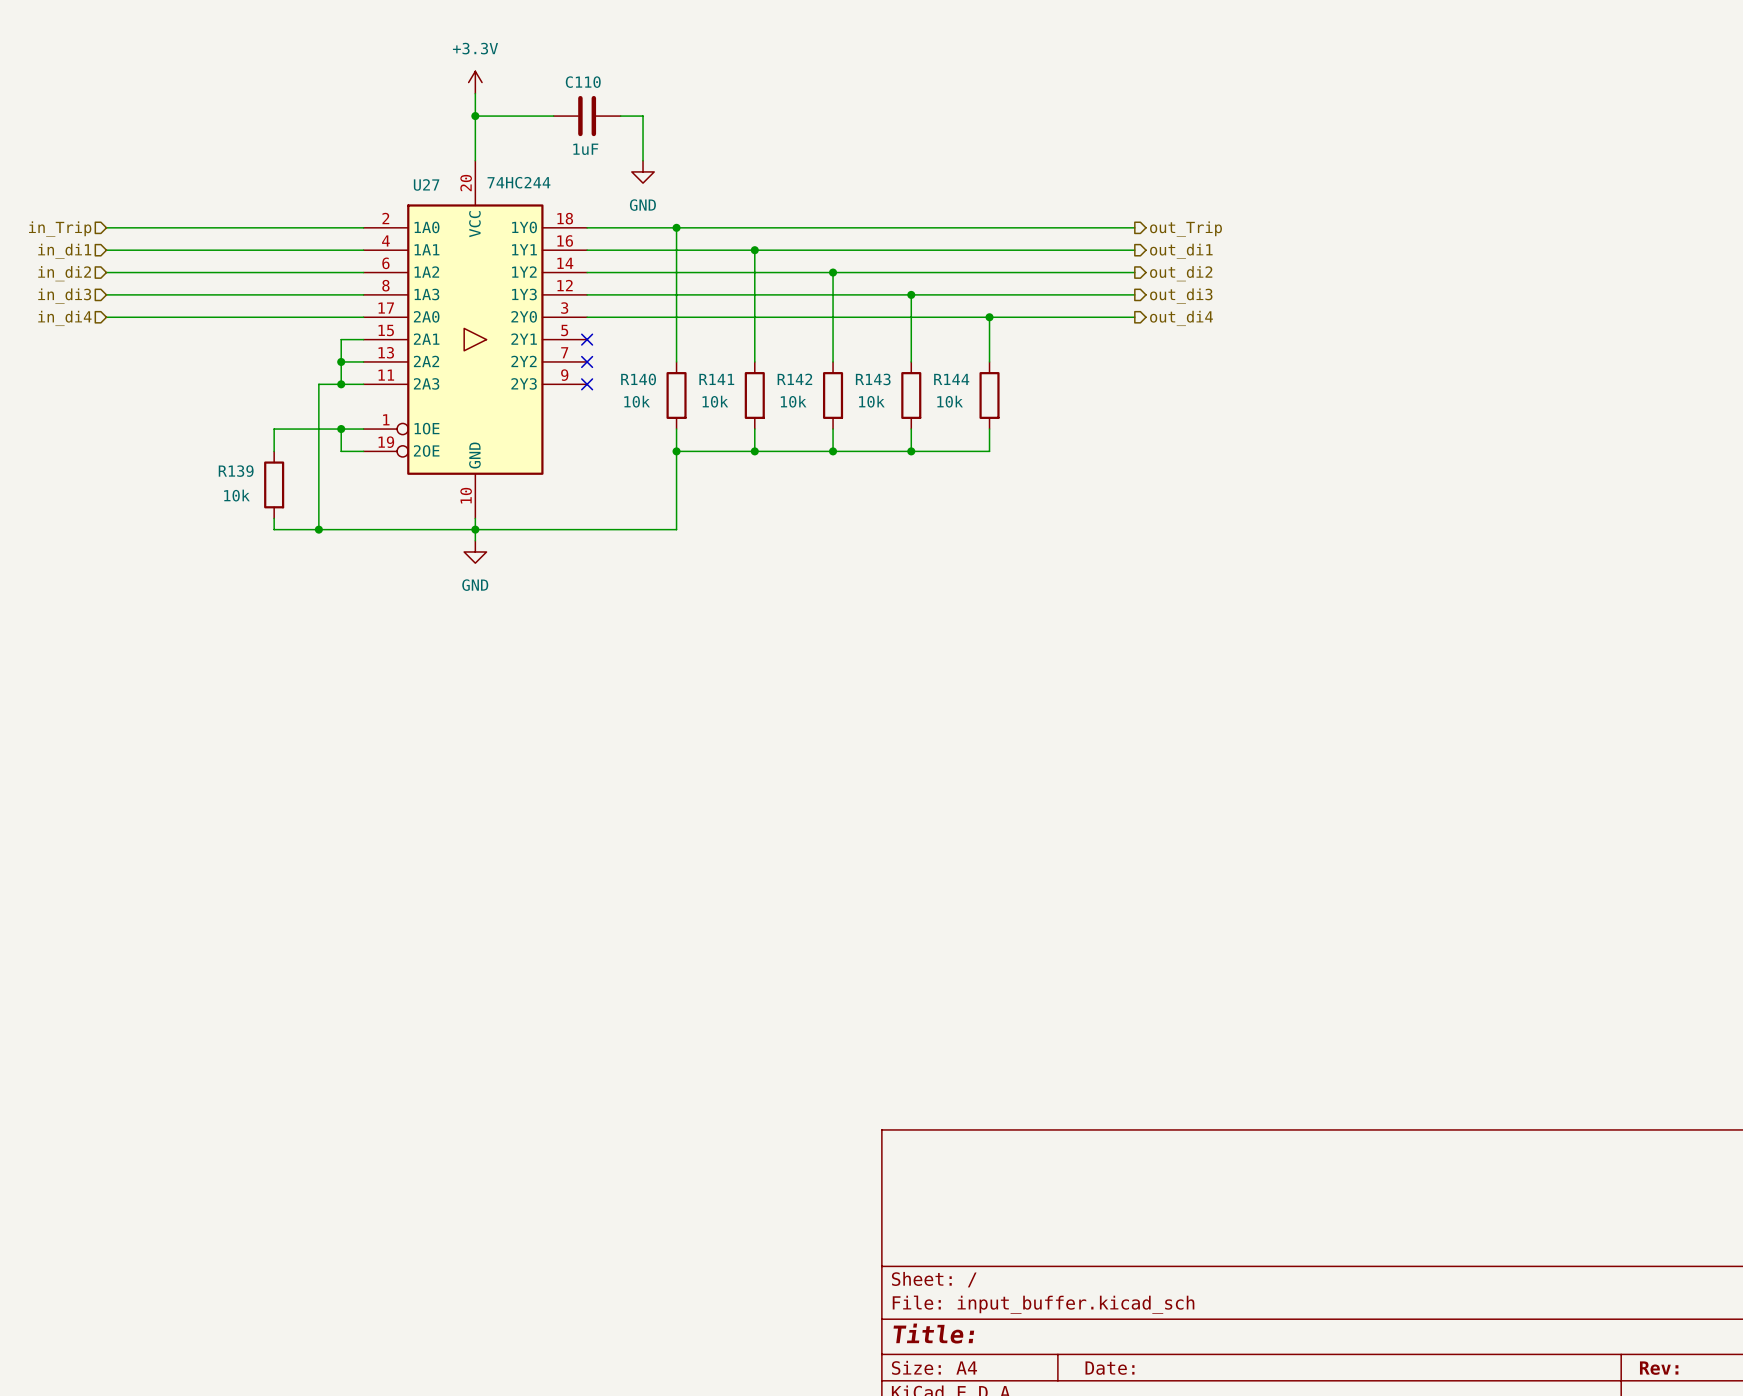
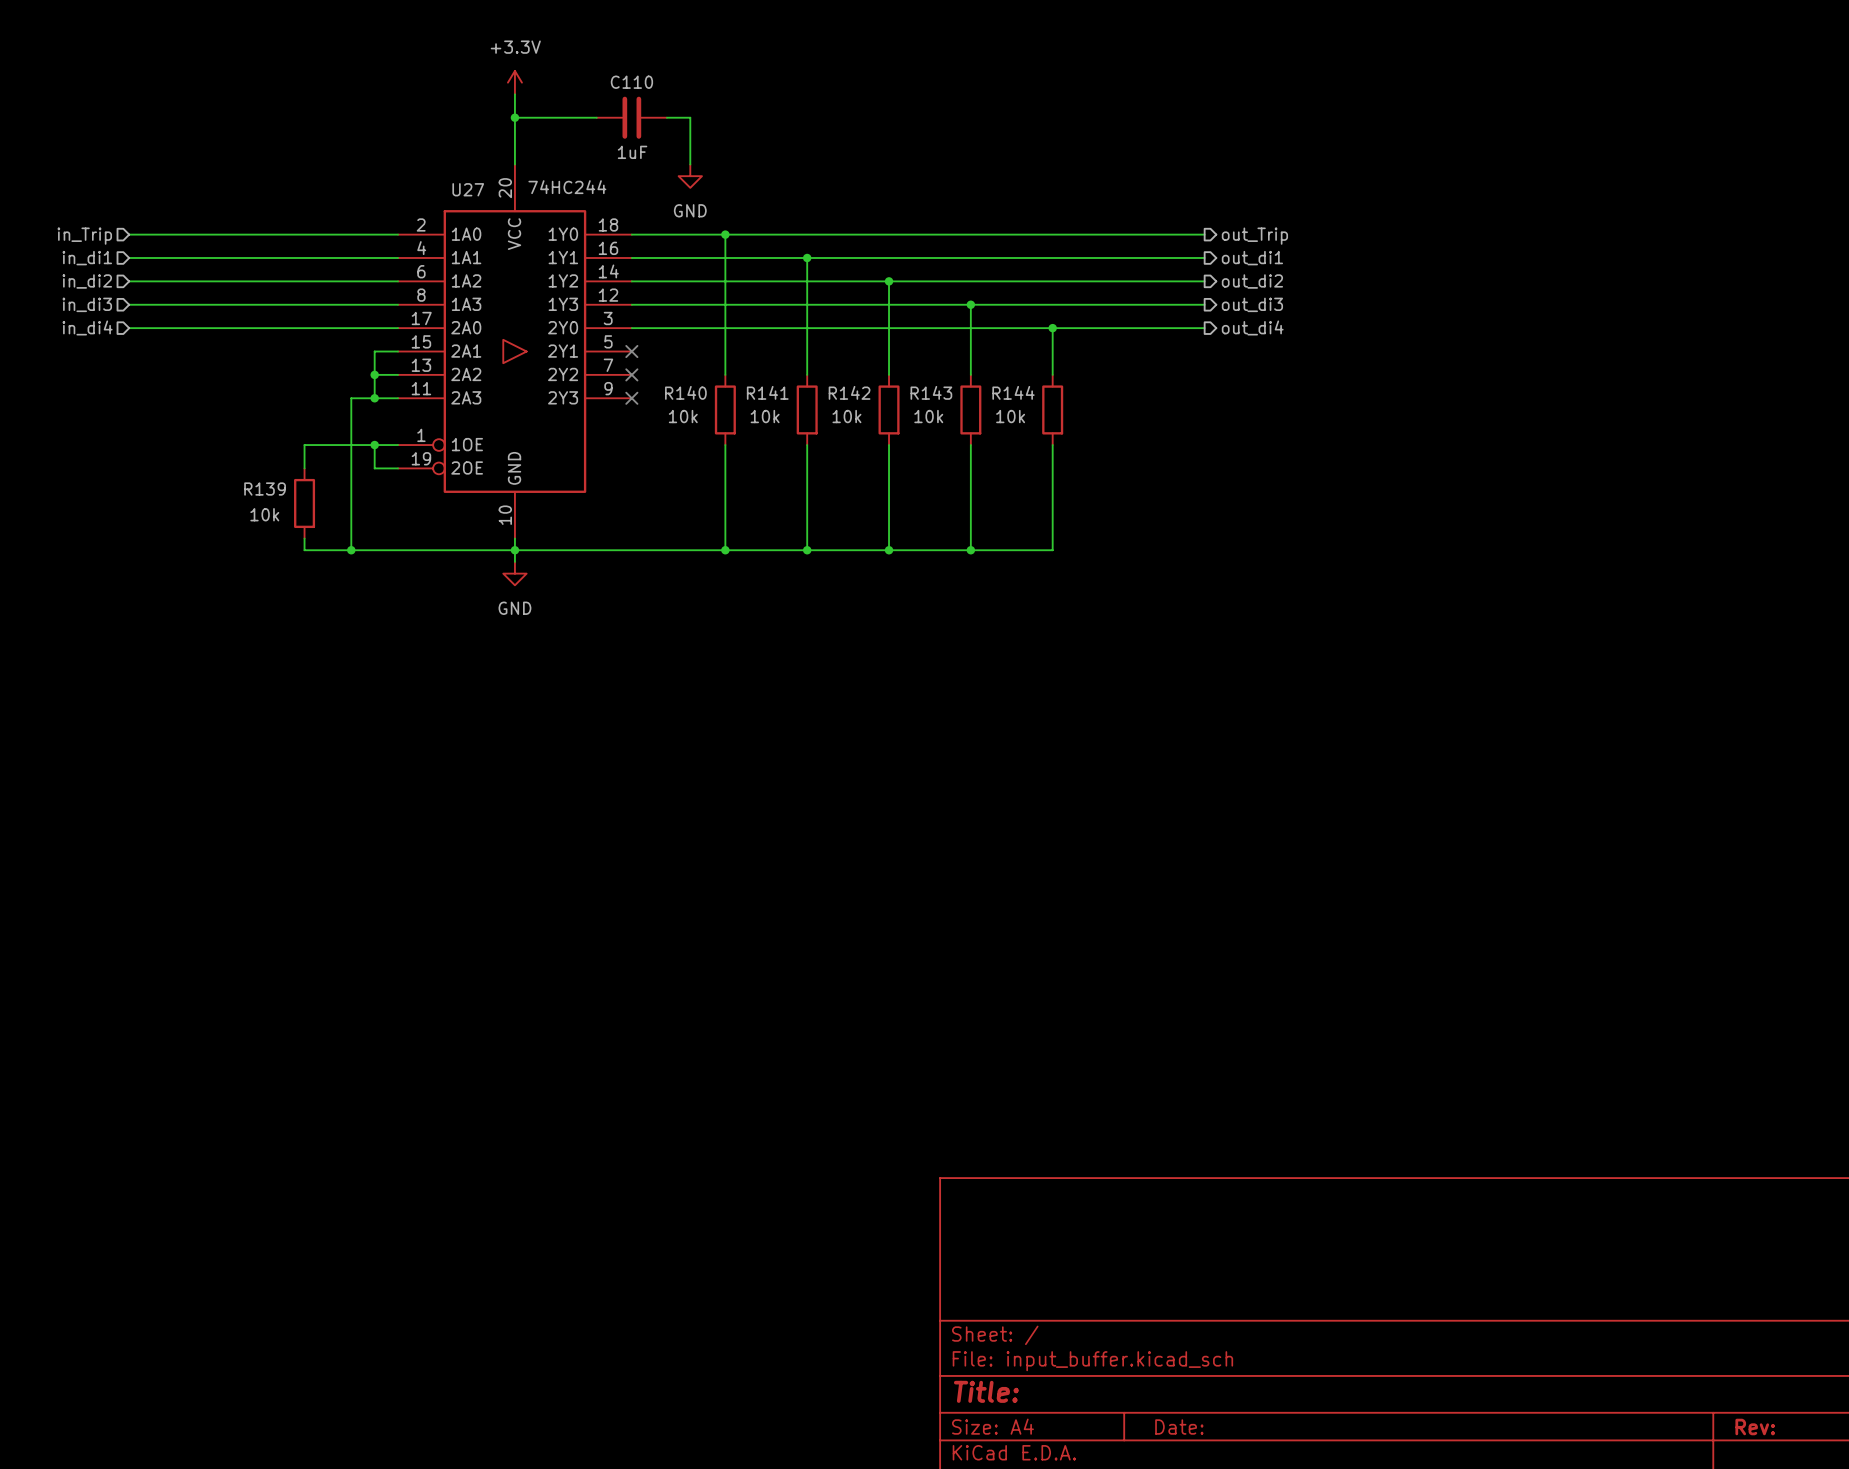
wire: (676, 451) (989, 451) -> (725, 550) (1052, 550) (1052, 468)
junction: (676, 451) -> none
wire: none -> (807, 468) (807, 550)
junction: (754, 451) -> none
wire: none -> (889, 468) (889, 550)
junction: (833, 451) -> none
wire: none -> (970, 468) (970, 550)
junction: (911, 451) -> none
junction: none -> (725, 550)
junction: none -> (807, 550)
junction: none -> (889, 550)
junction: none -> (970, 550)

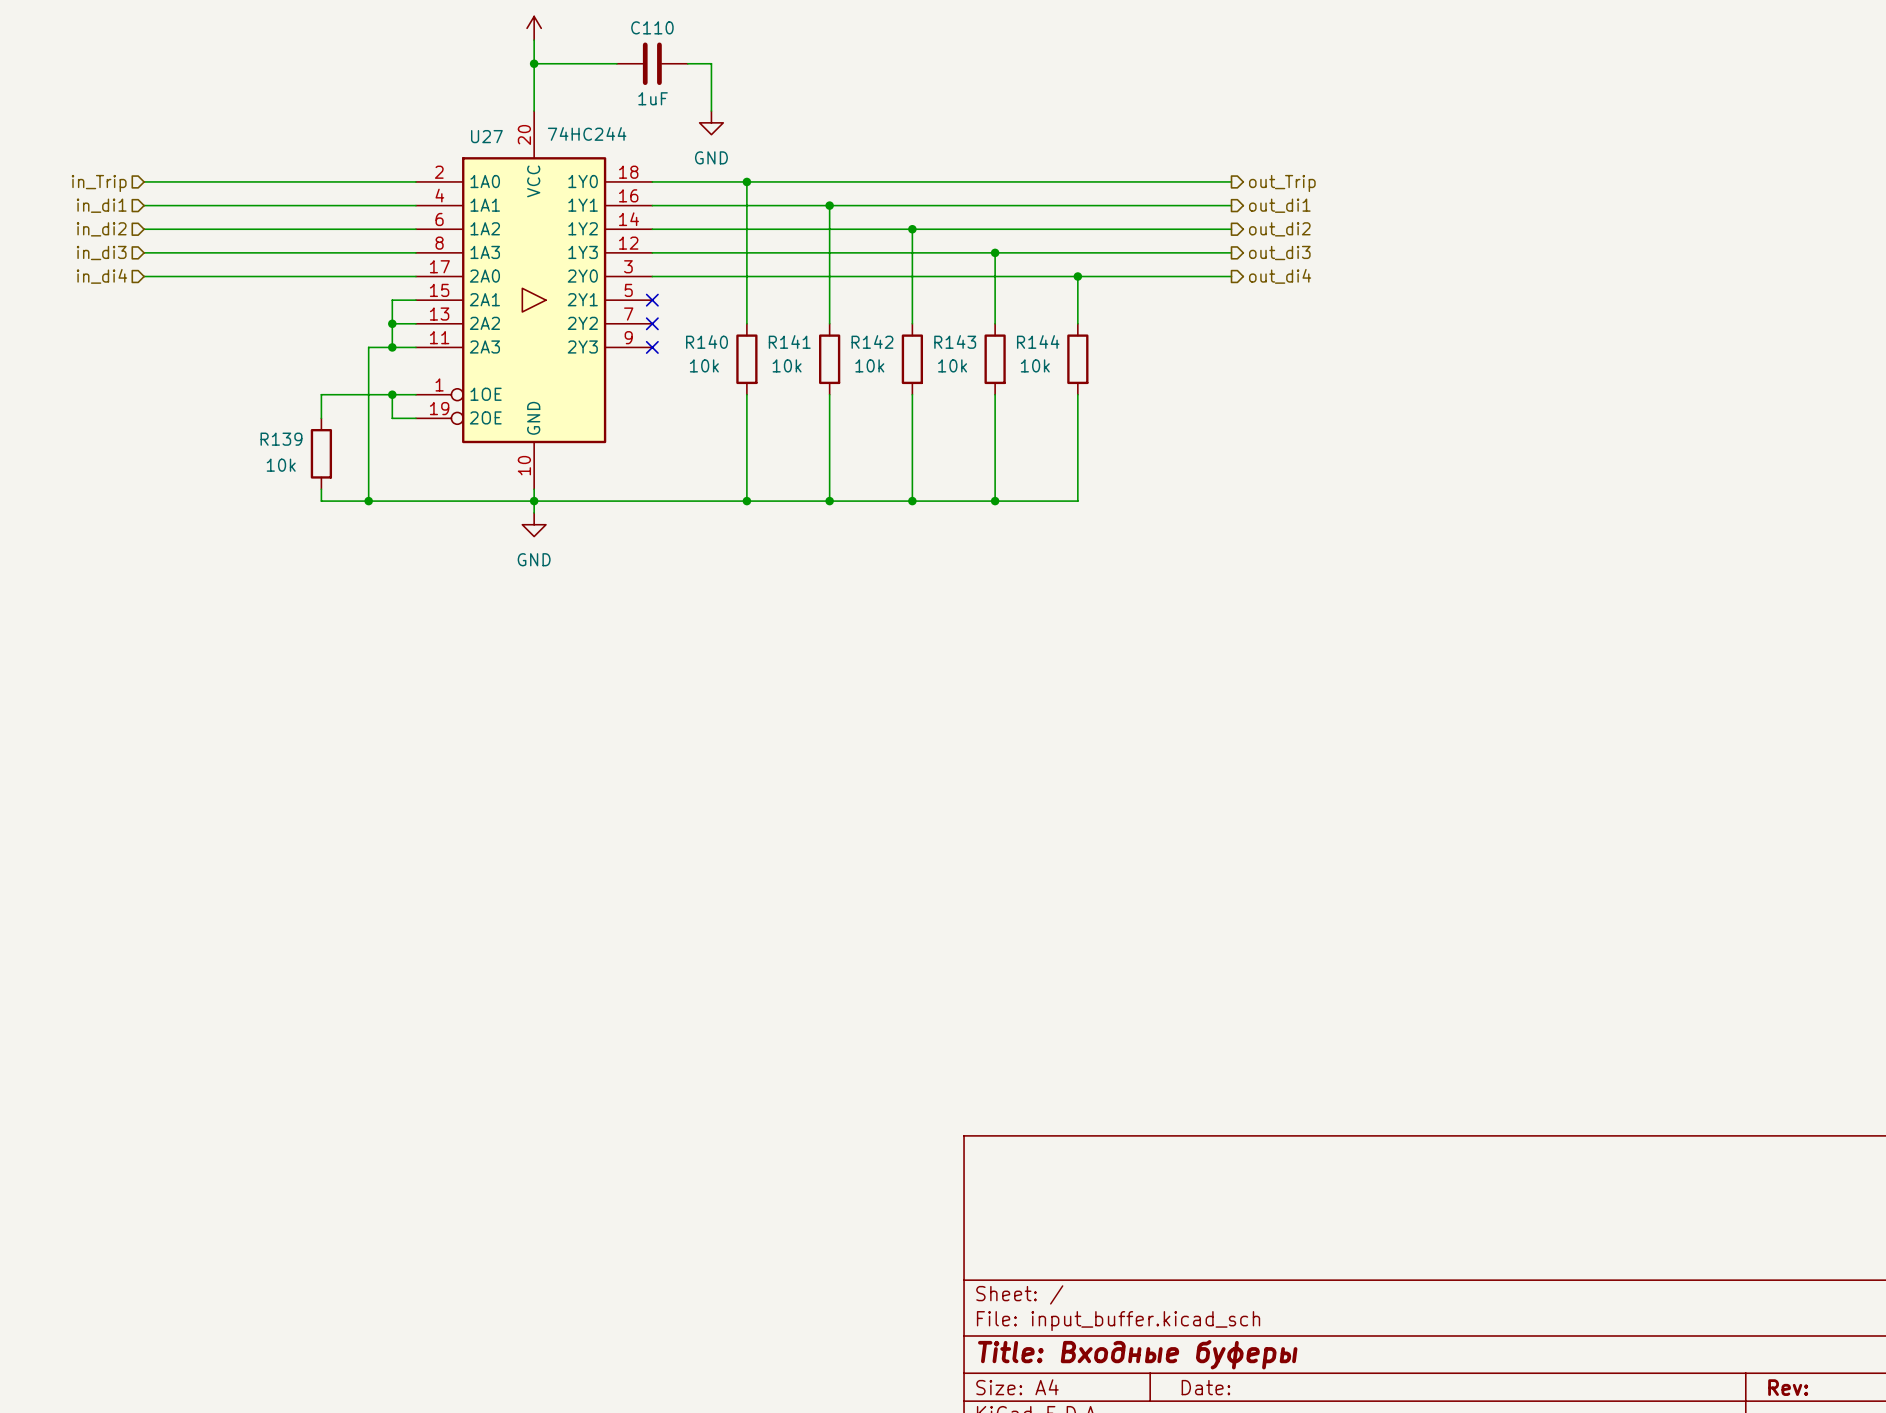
title block: Title: (986, 1391) -> Title: Входные буферы (1137, 1354)

